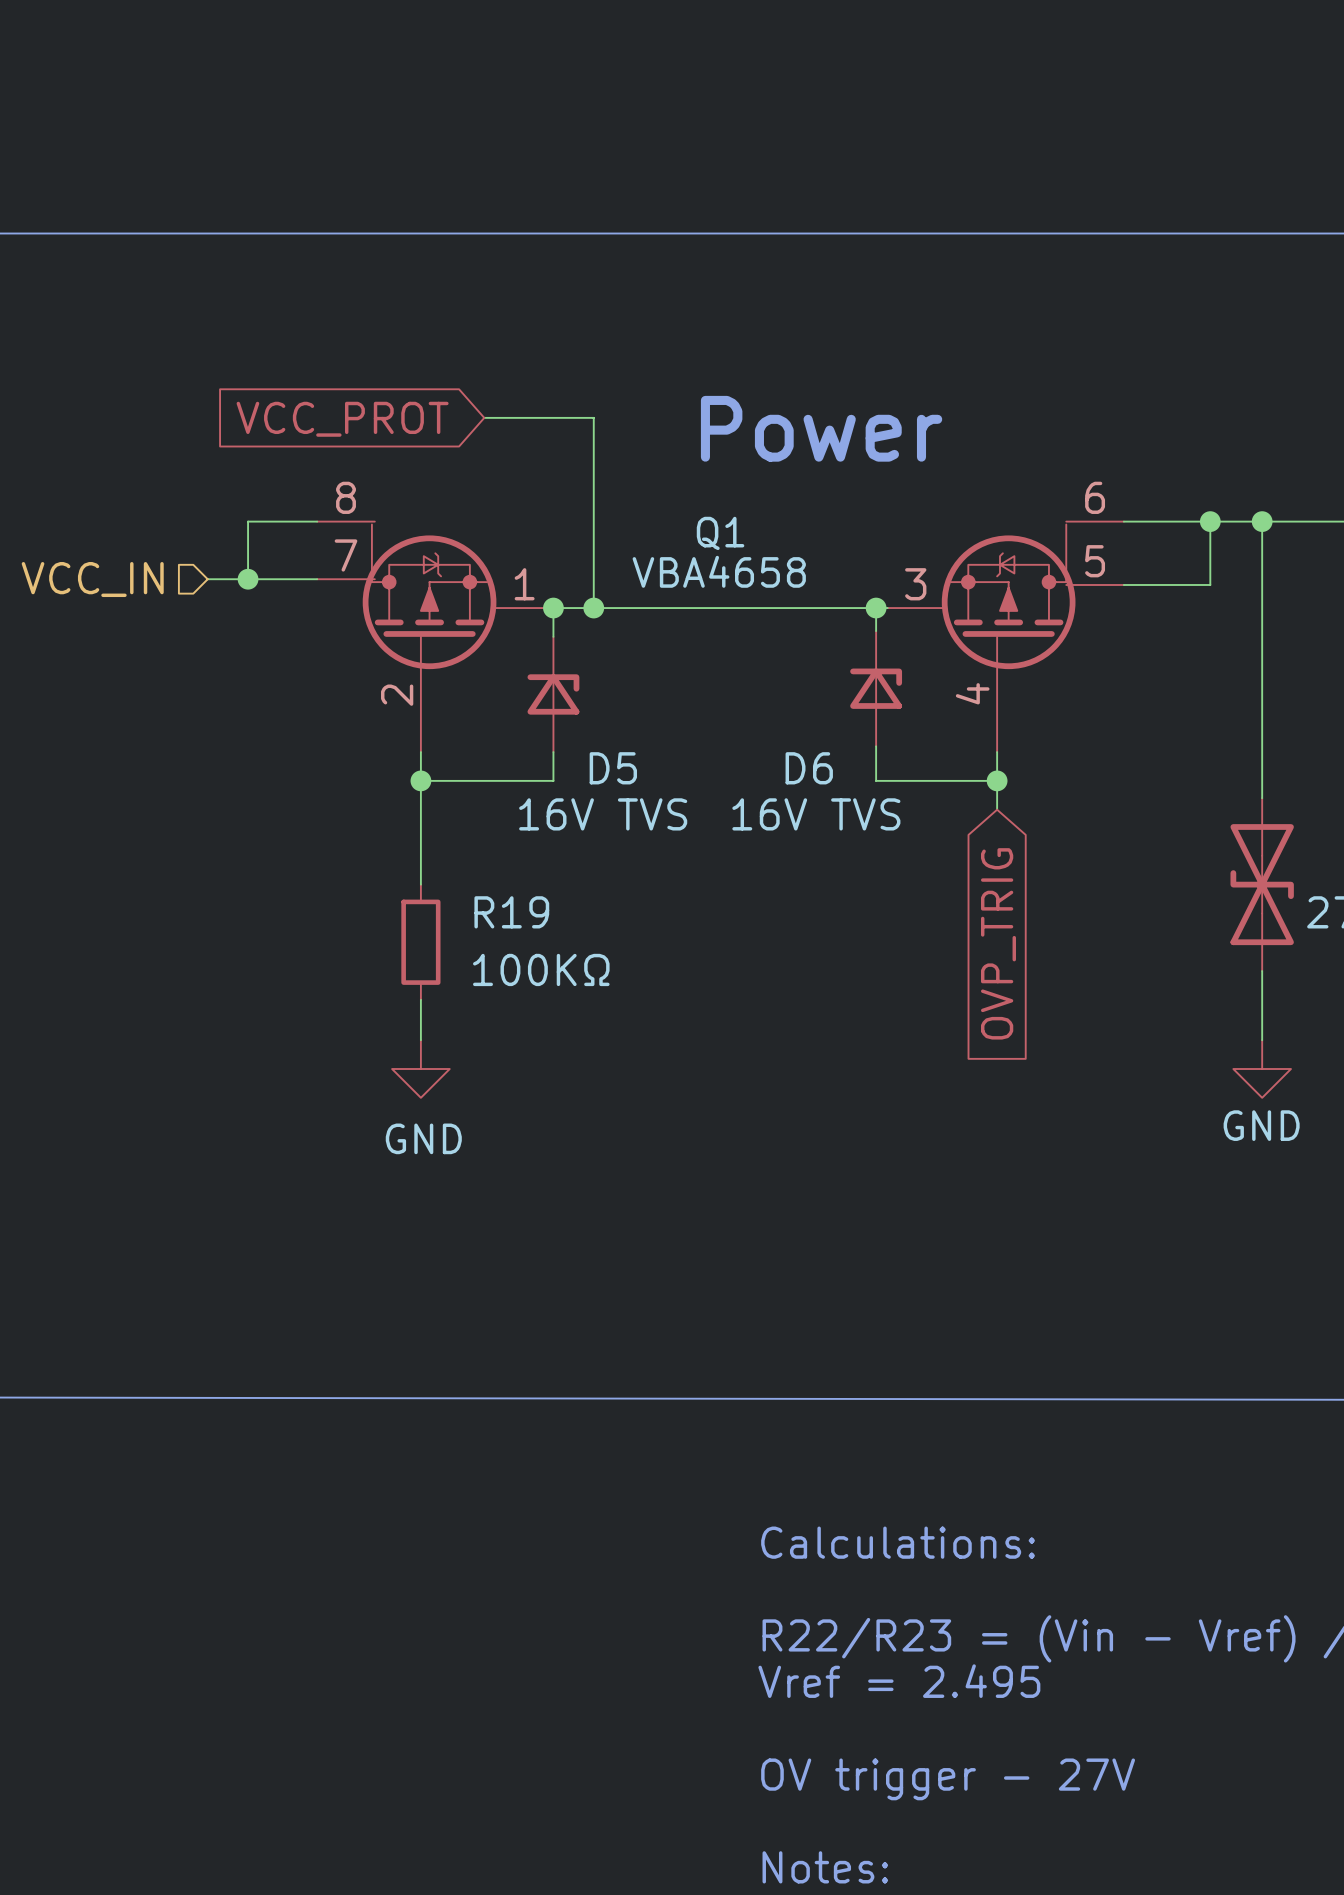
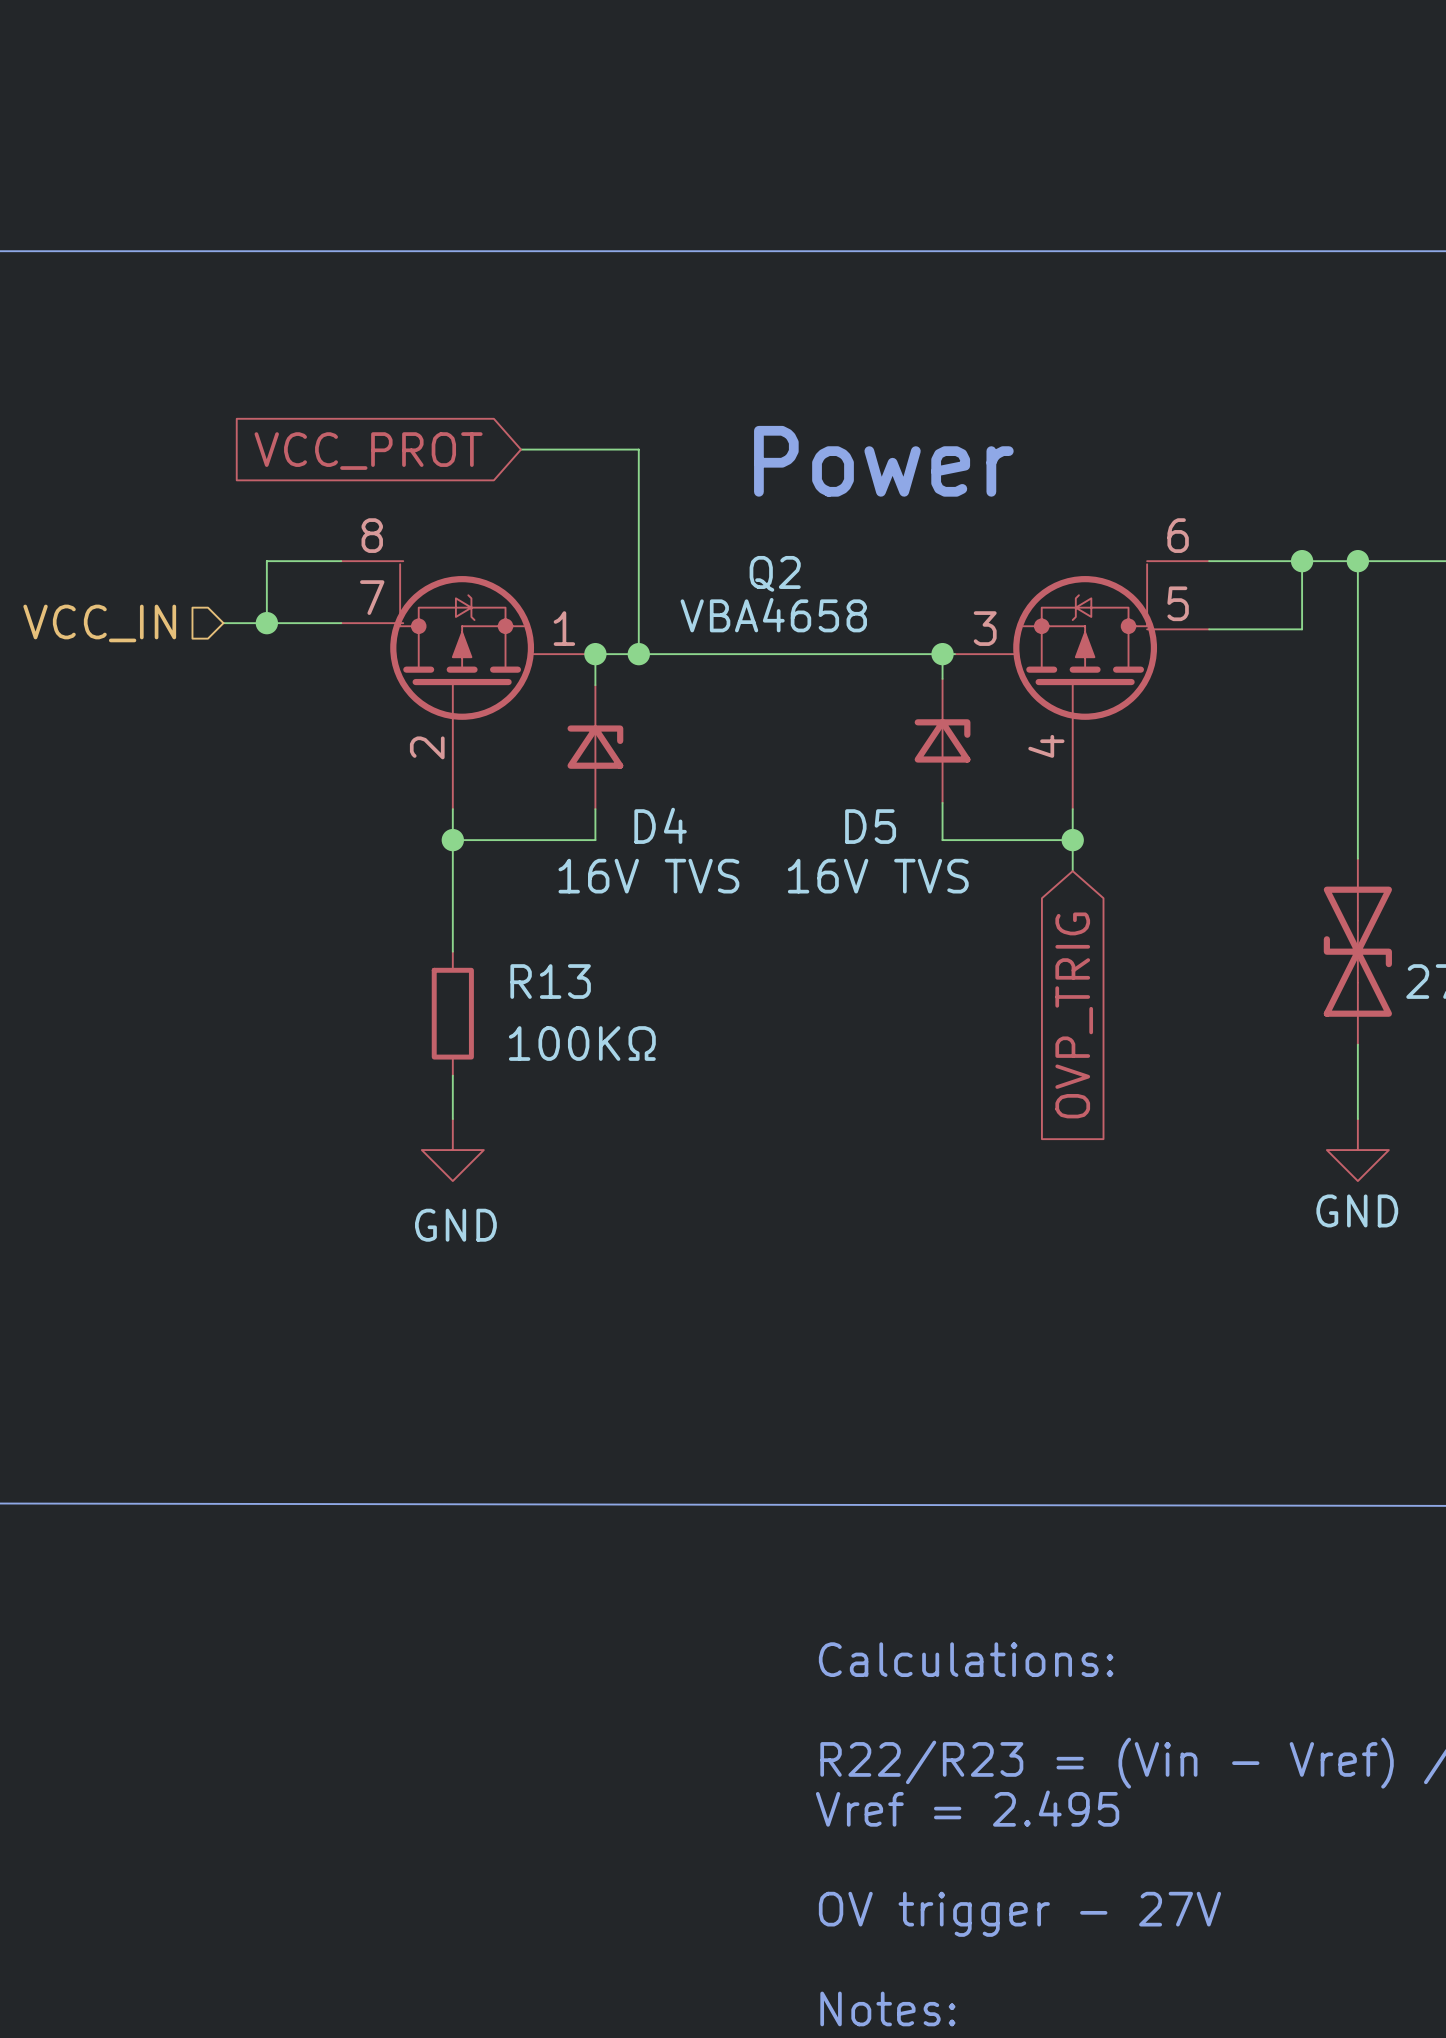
Q1 name: Q1 (720, 533) -> Q2 (775, 573)
D5 name: D5 (613, 768) -> D4 (660, 825)
D6 name: D6 (809, 768) -> D5 (870, 826)
R19 name: R19 (511, 912) -> R13 (550, 981)

